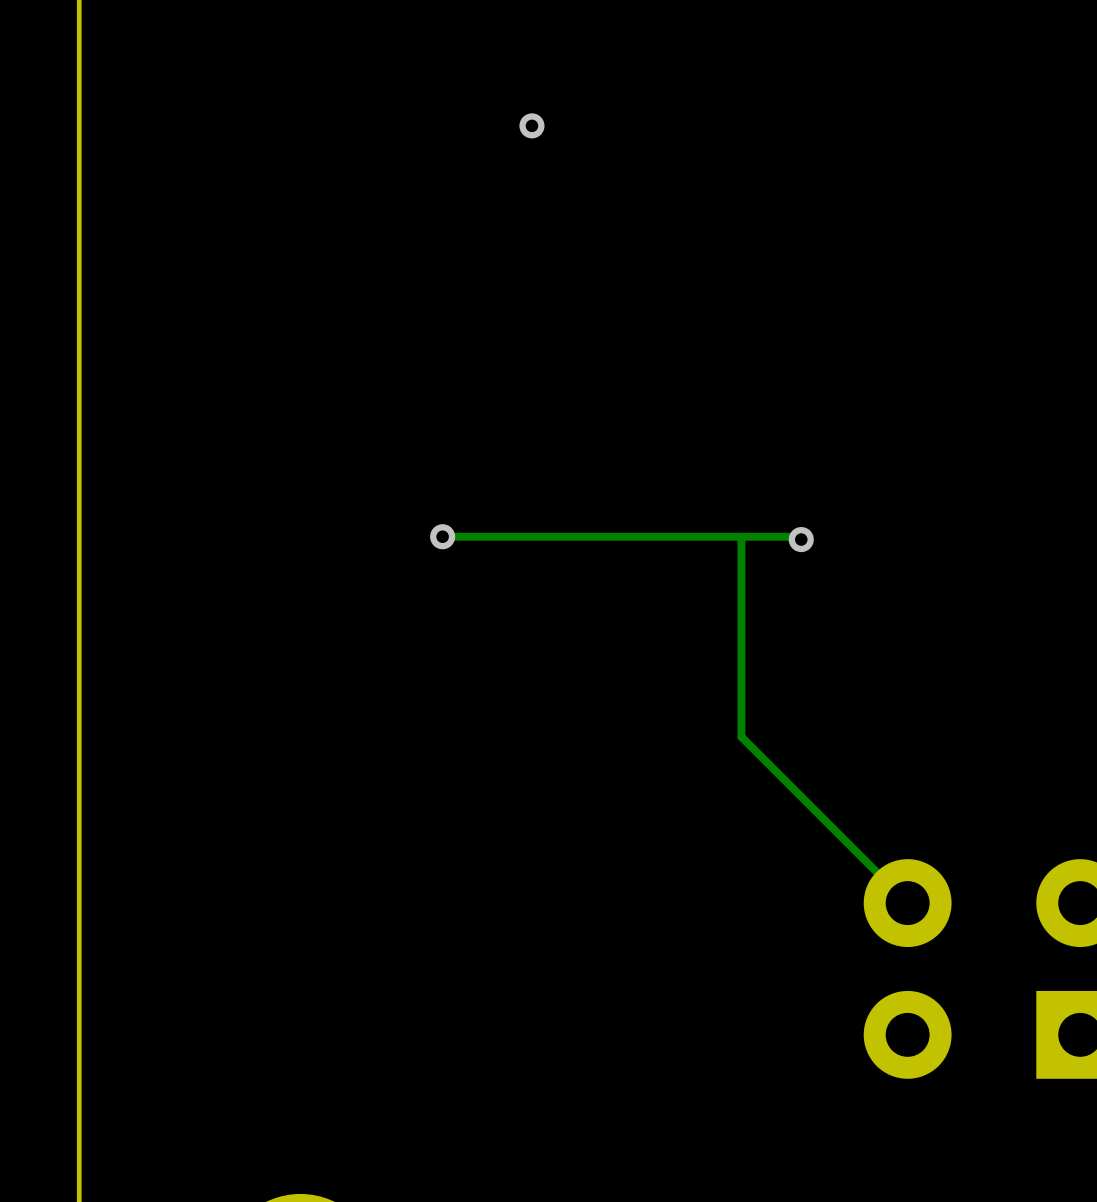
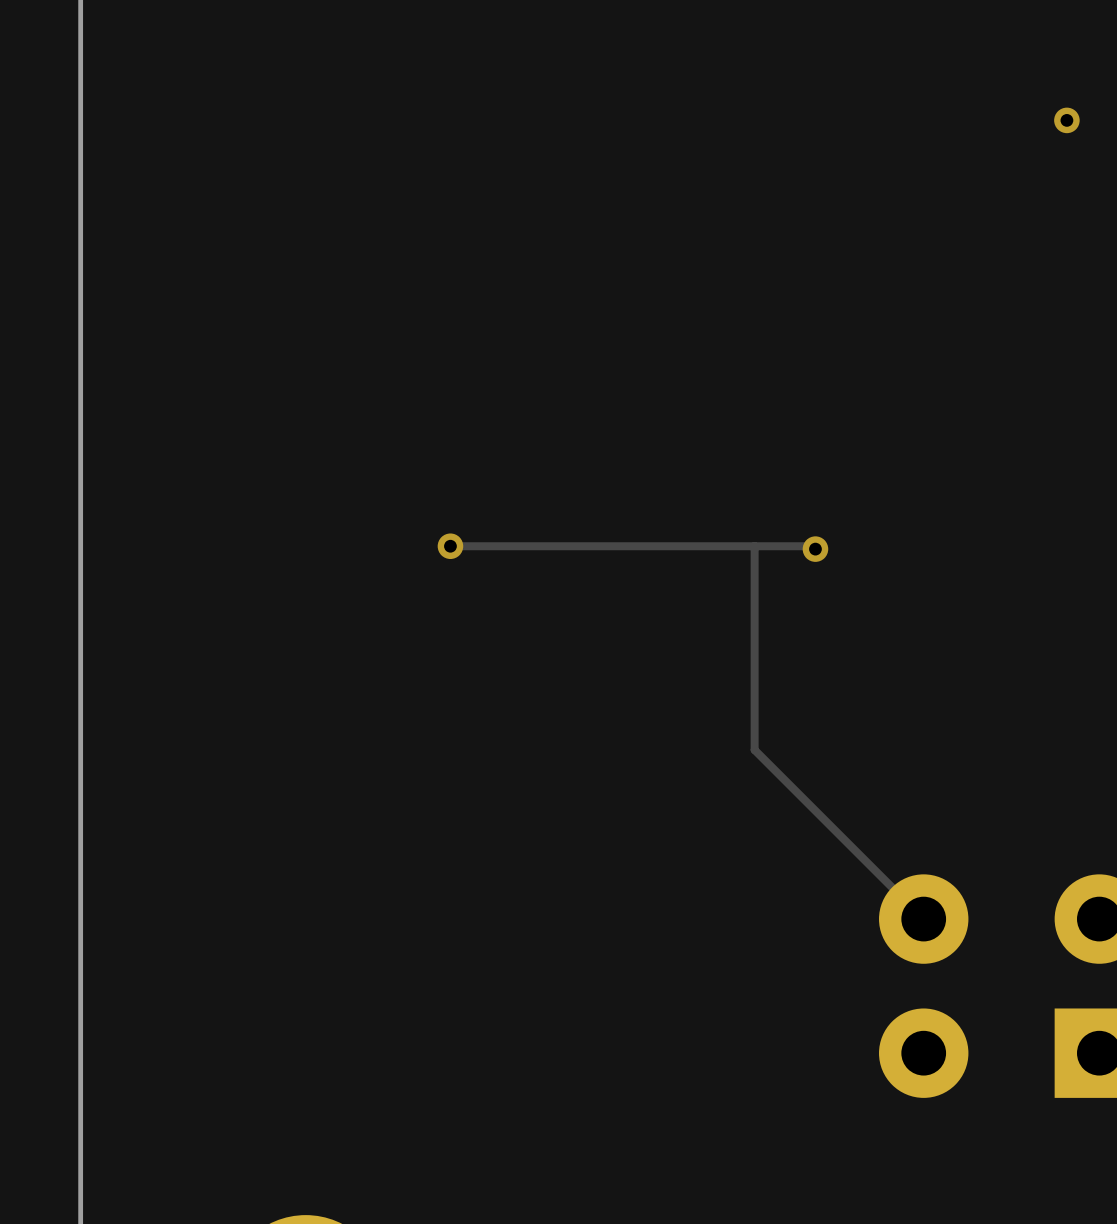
via: none -> (1066, 120)
via: (531, 125) -> none

